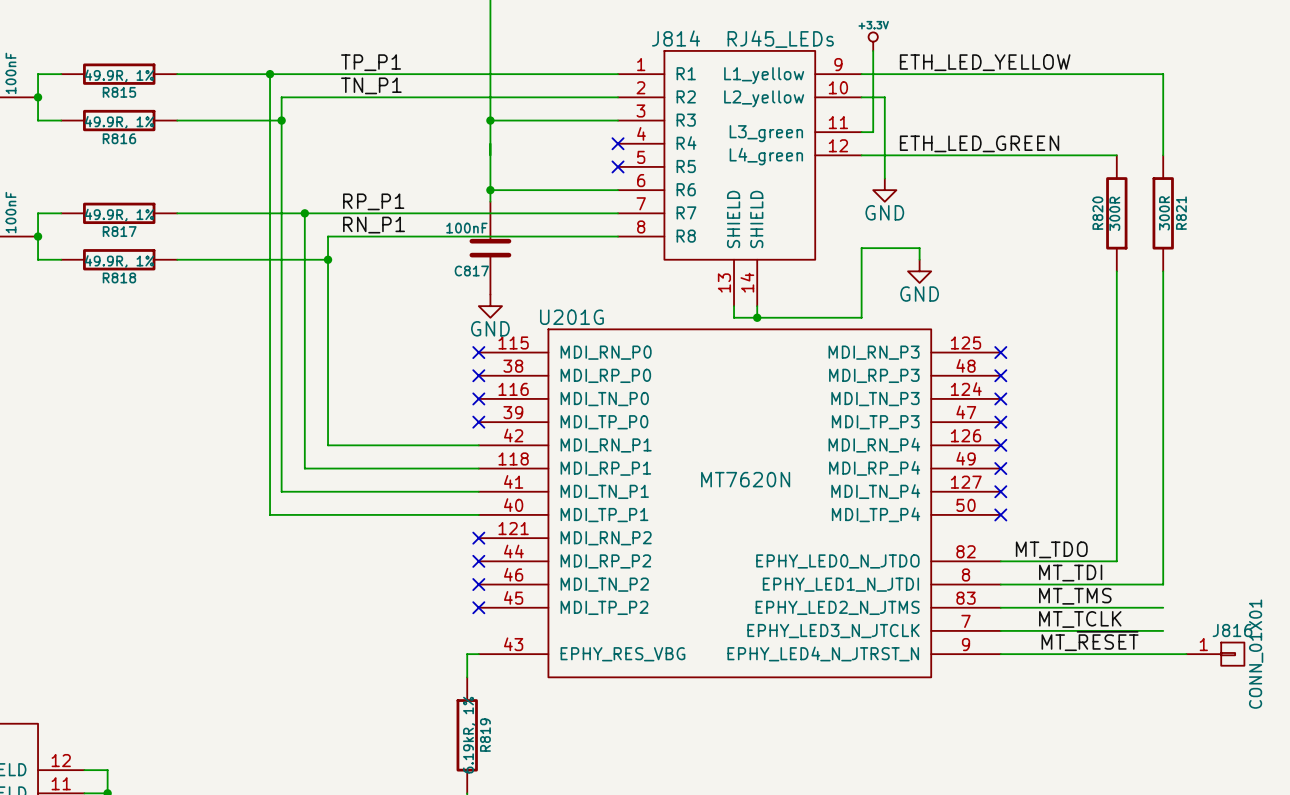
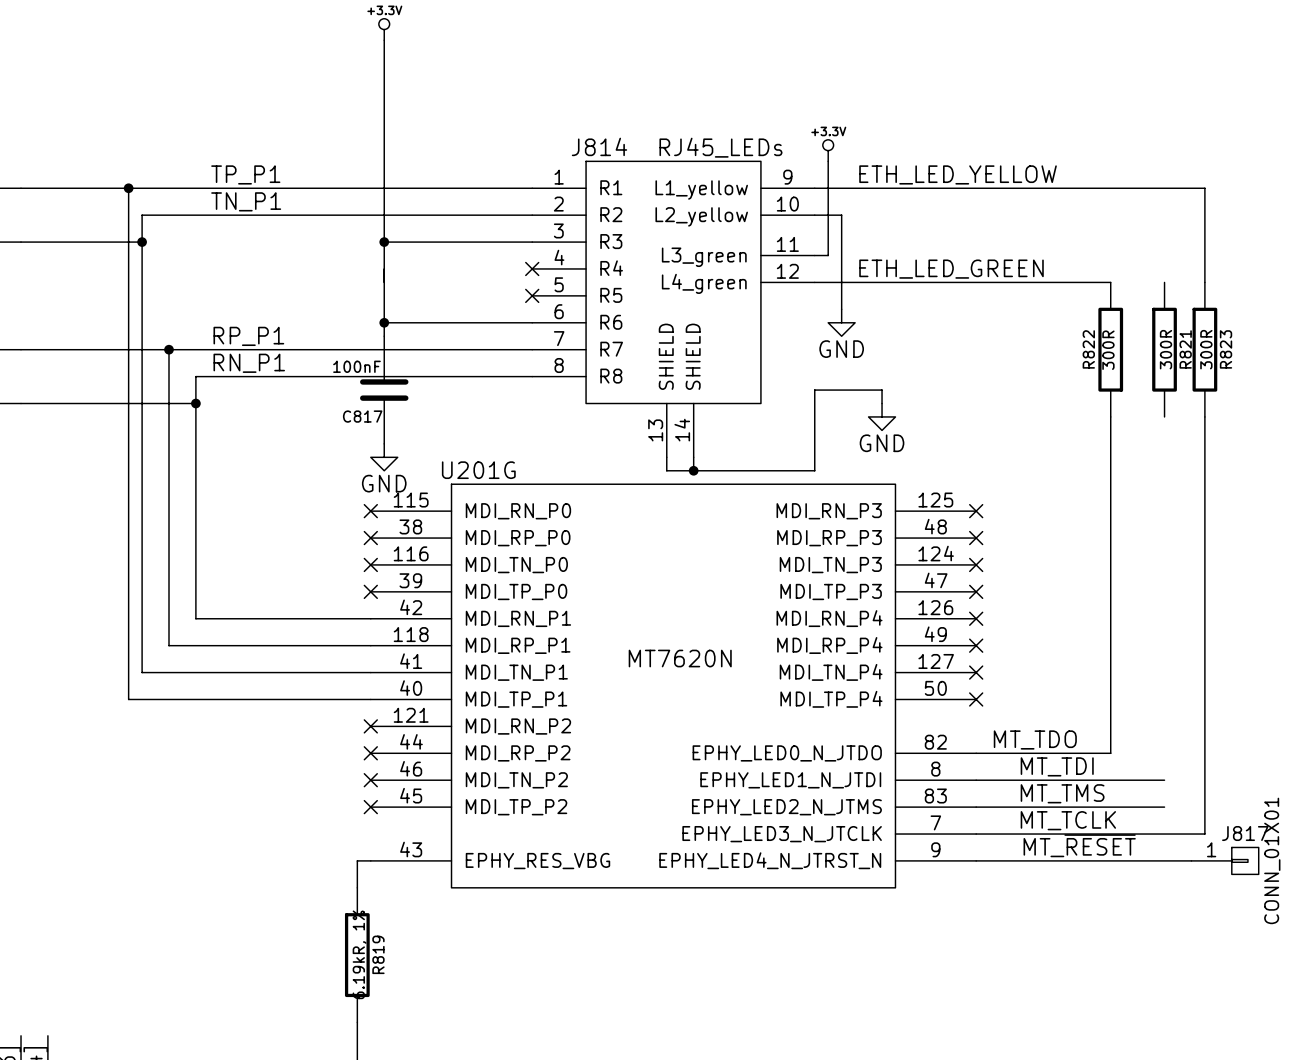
wire: (1163, 74) (1163, 155) -> (1164, 188) (1204, 188) (1204, 282)
R820 name: R820 (1097, 213) -> R822 (1088, 349)
R823: none -> 300R (1204, 349)
wire: (1163, 271) (1163, 584) -> none
wire: none -> (1204, 416) (1204, 834) (1164, 834)
J816 name: J816 (1232, 630) -> J817 (1245, 833)

